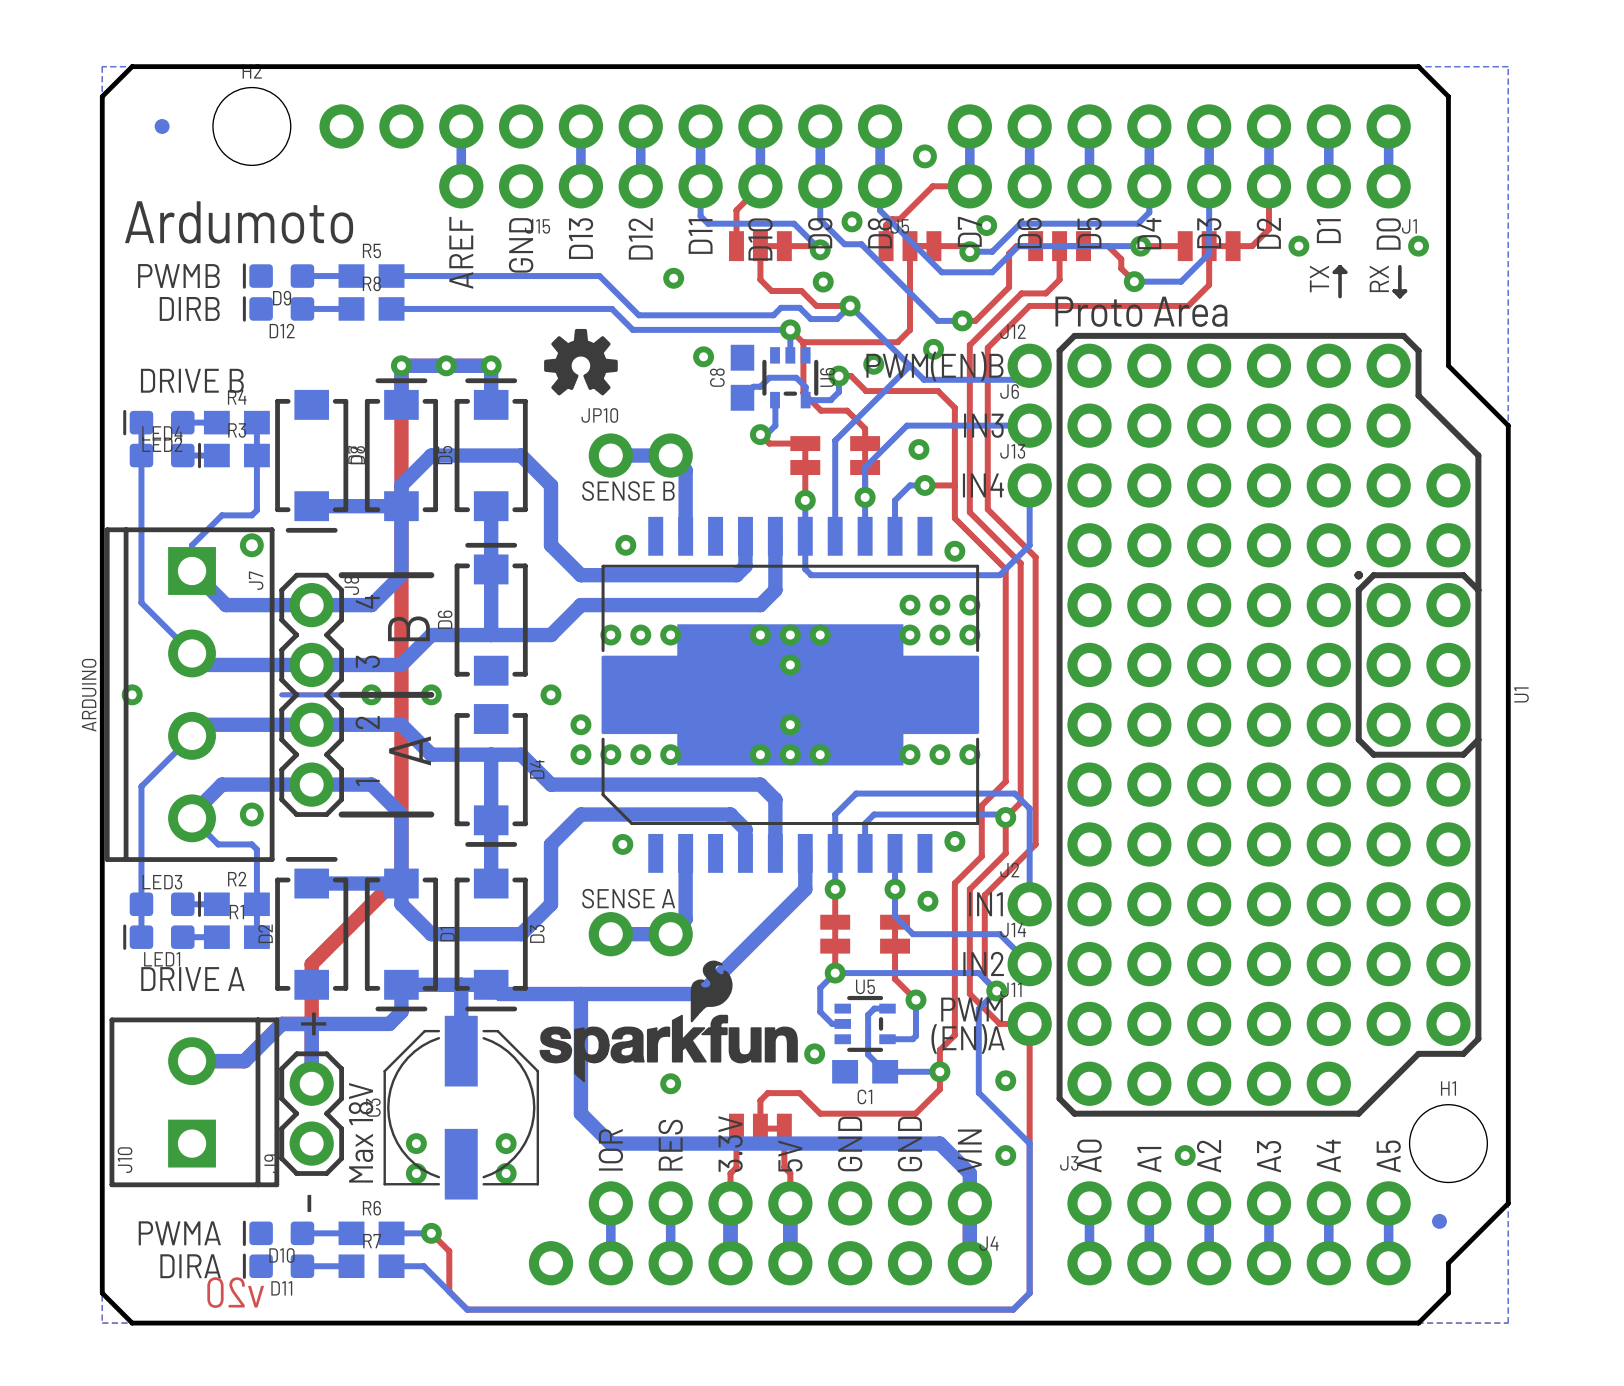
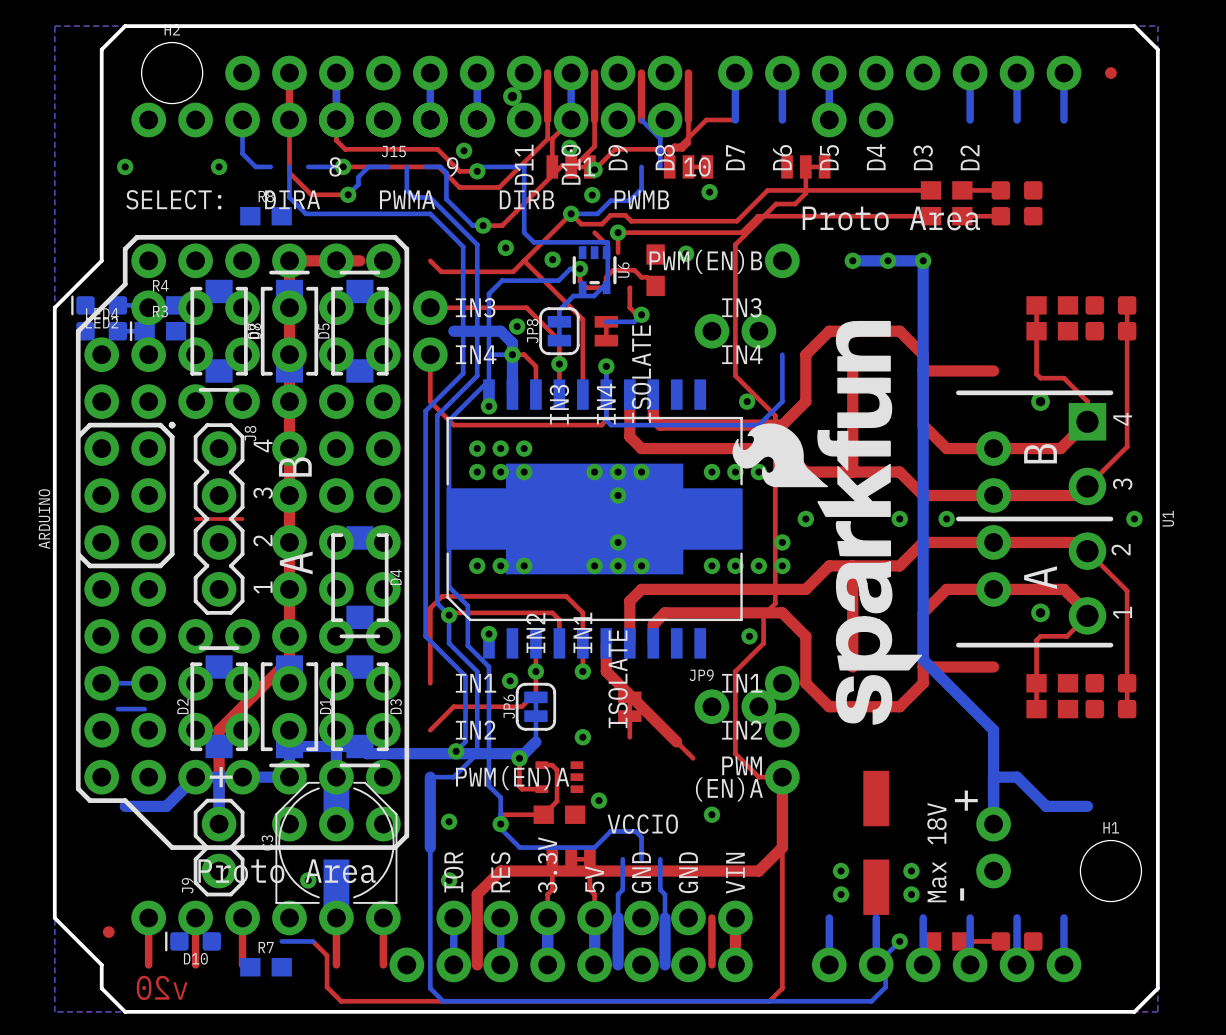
board edge: (192, 66) (132, 66) (102, 96) (102, 425) -> (125, 26) (101, 49) (101, 260) (54, 307)
board edge: (1418, 66) (1448, 96) (1448, 365) (1508, 425) -> (1087, 26) (1134, 26) (1157, 49) (1157, 307)
part: (162, 126) -> none
top track: none -> (289, 73) (289, 172) (311, 194) (348, 194)
top track: none -> (336, 73) (336, 140) (345, 149) (437, 149) (459, 171) (477, 171)
bottom track: (700, 126) (700, 216) (708, 223) (794, 223) (820, 249) -> none
top track: none -> (547, 73) (547, 139) (499, 187) (459, 187) (439, 166) (343, 166)
top track: none -> (594, 73) (594, 146) (575, 165) (562, 165) (502, 225) (483, 225)
bottom track: (820, 126) (820, 219) (844, 244) (861, 244) (938, 320) (962, 320) -> none
top track: none -> (641, 73) (641, 119)
bottom track: (880, 126) (880, 210) (941, 272) (992, 272) (1018, 246) (1140, 246) -> none
top track: none -> (688, 73) (688, 143) (682, 149) (615, 149) (594, 169)
bottom track: (1149, 126) (1149, 212) (1138, 223) (1020, 223) (992, 251) (969, 251) -> none
bottom track: (1209, 126) (1209, 253) (1181, 281) (1134, 281) -> none
part: none -> (1110, 73)
via: none -> (512, 96)
via: (924, 156) -> none
bottom track: none -> (242, 119) (242, 153) (255, 166) (270, 166)
part: none -> (312, 119)
bottom track: none -> (641, 119) (660, 138) (660, 166)
part: none -> (852, 119)
J1: (1179, 186) -> none
top track: (1268, 186) (1268, 229) (1252, 246) (1233, 246) -> none
via: none -> (569, 147)
via: (852, 221) -> none
text: Ardumoto (239, 222) -> none
via: none -> (464, 150)
via: (986, 225) -> none
text: D1 (1328, 231) -> none
text: D0 (1388, 234) -> none
text: D13 (581, 238) -> none
text: D12 (640, 238) -> none
text: GND (521, 245) -> none
via: none -> (125, 166)
via: none -> (219, 166)
bottom track: none -> (289, 166) (289, 197) (305, 213) (430, 213) (463, 246) (463, 373) (425, 411) (425, 636) (465, 676) (465, 741) (456, 751)
text: none -> 8 (335, 166)
bottom track: none -> (343, 166) (308, 166)
via: none -> (343, 166)
bottom track: none -> (388, 166) (368, 166) (358, 177) (358, 184) (348, 194)
bottom track: none -> (425, 166) (440, 166) (446, 172) (446, 199) (472, 225) (483, 225)
text: none -> 9 (452, 166)
top track: (760, 246) (760, 279) (771, 291) (801, 291) (816, 305) (850, 305) -> none
top track: (784, 246) (816, 246) (820, 249) -> none
text: none -> 1 (589, 166)
bottom track: none -> (641, 166) (641, 188) (629, 200) (610, 200) (597, 213) (571, 213)
text: none -> 10 (697, 166)
top track: (1035, 246) (1016, 246) (1009, 253) (1009, 287) (975, 320) (962, 320) -> none
top track: (1083, 246) (1108, 246) (1121, 259) (1121, 268) (1134, 281) -> none
via: (1140, 246) -> none
top track: (1185, 246) (1140, 246) -> none
top track: (1209, 246) (1209, 285) (1188, 305) (1029, 305) (987, 347) (987, 509) (1035, 557) (1035, 844) (984, 895) (984, 979) (996, 991) -> none
part: (1209, 246) -> none
via: (1298, 246) -> none
via: (1418, 246) -> none
via: none -> (594, 169)
via: (820, 249) -> none
bottom track: none -> (477, 171) (481, 166) (524, 166) (524, 232) (533, 242) (607, 242) (607, 282) (594, 296) (573, 296) (559, 310) (559, 321)
via: none -> (477, 171)
top track: (969, 251) (964, 246) (909, 246) (909, 329) (897, 342) (803, 342) (803, 393) (821, 410) (847, 410) (865, 428) (865, 443) -> none
via: (969, 251) -> none
text: AREF (461, 252) -> none
line: (1340, 266) (1340, 296) -> none
line: (1340, 266) (1345, 272) (1334, 272) (1340, 266) -> none
line: (1399, 266) (1399, 296) -> none
text: PWMB (178, 276) -> none
D9: (278, 276) -> none
bottom track: (351, 276) (302, 276) -> none
R5: (371, 276) -> none
bottom track: (391, 276) (599, 276) (638, 315) (773, 315) (780, 307) (799, 307) (810, 319) (837, 319) (850, 305) (924, 379) (1015, 379) (1029, 365) -> none
top track: none -> (930, 190) (767, 190) (736, 221) (631, 221) (625, 215) (610, 215) (601, 224) (581, 224) (571, 213) (513, 271) (441, 271) (430, 260)
part: none -> (946, 190)
top track: none -> (1000, 190) (962, 190)
part: none -> (1017, 190)
via: (673, 278) -> none
via: none -> (709, 192)
text: RX (1379, 278) -> none
text: TX (1319, 279) -> none
via: none -> (348, 194)
via: (1134, 281) -> none
via: none -> (592, 195)
via: (823, 282) -> none
text: none -> PWMA (407, 199)
text: none -> PWMB (641, 199)
text: none -> SELECT: (173, 199)
text: none -> DIRA (292, 199)
line: (1399, 296) (1394, 291) (1405, 291) (1399, 296) -> none
via: none -> (571, 213)
via: (850, 305) -> none
text position: DIRB (189, 308) -> DIRB (527, 199)
D12: (278, 308) -> none
bottom track: (351, 308) (302, 308) -> none
bottom track: (391, 308) (611, 308) (632, 329) (790, 329) (790, 355) -> none
top track: none -> (930, 216) (758, 216) (741, 232) (618, 232) (618, 252)
part: none -> (946, 216)
top track: none -> (1000, 216) (962, 216)
part: none -> (1017, 216)
via: none -> (483, 225)
via: (962, 320) -> none
drawing: [544, 328, 618, 396] -> none
via: (790, 329) -> none
via: none -> (618, 232)
line: none -> (395, 237) (136, 237) (125, 249) (125, 284) (78, 331) (78, 788) (89, 800) (125, 800) (172, 847) (395, 847) (406, 835) (406, 249) (395, 237)
line: (1403, 335) (1074, 335) (1059, 350) (1059, 1098) (1074, 1113) (1358, 1113) (1418, 1053) (1463, 1053) (1478, 1038) (1478, 455) (1418, 395) (1418, 350) (1403, 335) -> none
via size: [1187, 343, 1232, 388] -> [914, 252, 932, 270]
via: none -> (505, 247)
via: (933, 349) -> none
via size: [390, 355, 412, 377] -> [272, 243, 307, 279]
via: (703, 356) -> none
via: none -> (686, 253)
via: none -> (552, 259)
via: (873, 364) -> none
via: none -> (148, 260)
via: none -> (195, 260)
via: none -> (242, 260)
via: (446, 365) -> none
via: none -> (336, 260)
via: (491, 365) -> none
via: none -> (383, 260)
top track: none -> (524, 260) (582, 319) (582, 394)
bottom track: (909, 365) (835, 440) (835, 536) -> none
via: (1089, 365) -> none
bottom track: none -> (852, 260) (923, 260) (923, 659) (993, 730) (993, 824)
via: none -> (852, 260)
via: (1149, 365) -> none
via: none -> (887, 260)
via: (1268, 365) -> none
via: (1328, 365) -> none
via: (1388, 365) -> none
top track: none -> (579, 268) (579, 281) (586, 287) (606, 287) (606, 277) (613, 270) (634, 270) (641, 277) (646, 277) (655, 285)
bottom track: none -> (579, 268) (570, 268) (558, 280) (502, 280) (488, 293) (488, 380) (449, 420) (449, 587) (467, 605) (467, 645) (488, 666) (488, 785) (500, 797) (500, 828) (519, 847) (594, 847) (610, 831) (635, 831) (641, 837) (641, 859)
via: none -> (579, 268)
top track: (838, 376) (851, 376) (866, 391) (938, 391) (954, 407) (954, 518) (1005, 569) (1005, 781) (981, 805) (981, 856) (954, 883) (954, 1035) (939, 1050) (939, 1089) (915, 1113) (820, 1113) (799, 1093) (767, 1093) (760, 1100) (760, 1128) -> none
bottom track: (838, 376) (838, 391) (830, 400) (805, 400) (805, 387) (796, 377) (769, 377) (760, 386) (753, 386) (742, 397) -> none
via: (838, 376) -> none
C8 side: bottom (742, 377) -> top (655, 270)
text: DRIVE B (192, 380) -> none
bottom track: (775, 400) (775, 425) (766, 434) (760, 434) -> none
top track: none -> (630, 287) (629, 307) (636, 314) (641, 314)
bottom track: (491, 404) (491, 365) (401, 365) (401, 404) -> none
bottom track: (141, 422) (141, 602) (203, 664) (401, 664) (431, 635) (551, 635) (580, 605) (760, 605) (775, 590) (775, 536) -> none
bottom track: (256, 422) (256, 510) (251, 515) (221, 515) (192, 545) (192, 571) (226, 605) (371, 605) (401, 575) (401, 485) (431, 455) (521, 455) (551, 485) (551, 545) (580, 575) (736, 575) (745, 566) (745, 536) -> none
top track: none -> (1036, 305) (1036, 374) (1040, 378) (1064, 378) (1087, 401) (1087, 421) (1060, 448) (946, 448) (923, 425) (923, 354) (899, 331) (829, 331) (805, 354) (805, 401) (782, 425) (660, 425) (653, 418) (653, 394)
part: none -> (1052, 305)
part: none -> (1110, 305)
top track: none -> (1127, 305) (1127, 446) (1078, 495) (923, 495) (899, 472) (805, 472) (782, 448) (641, 448) (629, 436) (629, 394)
via: none -> (148, 307)
via: none -> (195, 307)
via: none -> (242, 307)
via: none -> (289, 307)
via: none -> (336, 307)
via: none -> (383, 307)
top track: none -> (430, 307) (526, 307) (559, 340) (559, 394)
text: none -> IN3 (475, 307)
bottom track: (1029, 425) (907, 425) (865, 467) (865, 536) -> none
J6 position: (1029, 425) -> (430, 307)
via: (1089, 425) -> none
via: (1149, 425) -> none
via: (1209, 425) -> none
via: (1268, 425) -> none
via: (1328, 425) -> none
via: (1388, 425) -> none
top track: (760, 434) (769, 443) (805, 443) -> none
via: (760, 434) -> none
bottom track: none -> (641, 314) (634, 321) (606, 321)
via: none -> (641, 314)
drawing: none -> [732, 320, 923, 725]
via: none -> (517, 326)
via: (918, 449) -> none
JP10 position: (640, 455) -> (735, 331)
JP8 side: top (865, 455) -> bottom (559, 331)
part: none -> (1052, 331)
part: none -> (1110, 331)
top track: (805, 467) (805, 500) -> (430, 354) (430, 401) (453, 425) (601, 425) (606, 420) (606, 366)
via: none -> (101, 354)
via: none -> (148, 354)
via: none -> (195, 354)
via: none -> (242, 354)
via: none -> (289, 354)
via: none -> (336, 354)
via: none -> (383, 354)
text: none -> IN4 (476, 354)
top track: none -> (512, 354) (524, 354) (535, 366) (535, 394)
bottom track: none -> (512, 354) (488, 354)
via: none -> (512, 354)
bottom track: (924, 485) (909, 485) (895, 500) (895, 536) -> none
via: (924, 485) -> none
top track: (954, 485) (924, 485) -> none
J13 position: (1029, 485) -> (430, 354)
via: (1089, 485) -> none
via: (1149, 485) -> none
via: (1209, 485) -> none
via: (1268, 485) -> none
via: (1328, 485) -> none
via: (1388, 485) -> none
via: (1448, 485) -> none
text: SENSE B (628, 491) -> none
via: none -> (559, 364)
via: (865, 497) -> none
bottom track: (401, 506) (311, 506) -> none
bottom track: (491, 506) (491, 635) -> none
top track: none -> (852, 370) (852, 472)
top track: none -> (993, 370) (923, 370)
text: none -> ISOLATE (641, 374)
line: none -> (1110, 392) (958, 392)
text: none -> IN3 (559, 404)
text: none -> IN4 (606, 404)
via: none -> (101, 401)
via: none -> (148, 401)
via: (251, 545) -> none
via: none -> (195, 401)
via: none -> (242, 401)
via: none -> (289, 401)
via: none -> (336, 401)
via: none -> (383, 401)
via position: (625, 545) -> (488, 406)
via: (1089, 545) -> none
via: (1149, 545) -> none
via: (1209, 545) -> none
via: (1268, 545) -> none
via: (1328, 545) -> none
via: none -> (1040, 401)
via: (1388, 545) -> none
via: (1448, 545) -> none
via position: (954, 551) -> (747, 401)
text: none -> 4 (1122, 419)
line: none -> (172, 423) (170, 425) (172, 426) (173, 425) (172, 423)
line: (1358, 573) (1356, 575) (1358, 577) (1360, 575) (1358, 573) -> none
line: (431, 575) (341, 575) -> none
line: none -> (78, 436) (89, 425) (160, 425) (172, 436) (172, 554) (160, 565) (89, 565) (78, 554)
line: (1478, 590) (1463, 575) (1373, 575) (1358, 590) (1358, 739) (1373, 754) (1463, 754) (1478, 739) -> none
via: none -> (101, 448)
via: none -> (148, 448)
via: none -> (289, 448)
via: none -> (336, 448)
via: none -> (383, 448)
via: none -> (477, 448)
via: none -> (500, 448)
via: none -> (524, 448)
via: (909, 605) -> none
via: (939, 605) -> none
via: (969, 605) -> none
via: (1089, 605) -> none
via: (1149, 605) -> none
via: (1209, 605) -> none
via: (1268, 605) -> none
via: (1328, 605) -> none
via: (1388, 605) -> none
via: (1448, 605) -> none
text: none -> B (1040, 453)
D6: (491, 614) -> none
via: (610, 635) -> none
via: none -> (524, 472)
via: (760, 635) -> none
via: none -> (641, 472)
via: (909, 635) -> none
via: none -> (758, 472)
text: none -> 3 (1122, 484)
via: none -> (101, 495)
via: none -> (148, 495)
via: none -> (289, 495)
via: none -> (336, 495)
via: none -> (383, 495)
via position: (790, 664) -> (618, 495)
via: (1089, 664) -> none
via: (1149, 664) -> none
via: (1209, 664) -> none
via: (1268, 664) -> none
via: (1328, 664) -> none
via: (1388, 664) -> none
via: (1448, 664) -> none
via: (132, 694) -> none
J7: (189, 694) -> none
bottom track: (341, 694) (281, 694) -> none
via: (371, 694) -> none
line: (431, 694) (341, 694) -> none
via: (431, 694) -> none
via: (551, 694) -> none
via: none -> (805, 518)
via: none -> (899, 518)
via: none -> (946, 518)
part: none -> (993, 518)
part: none -> (1087, 518)
line: none -> (1110, 518) (958, 518)
via: none -> (1134, 518)
via: none -> (101, 542)
via: none -> (148, 542)
via: none -> (289, 542)
via: none -> (336, 542)
via: none -> (383, 542)
via: (580, 724) -> none
via position: (790, 724) -> (618, 542)
via: none -> (782, 542)
via: (1089, 724) -> none
via: (1149, 724) -> none
via: (1209, 724) -> none
via: (1268, 724) -> none
via: (1328, 724) -> none
via: (1388, 724) -> none
via: (1448, 724) -> none
text: none -> 2 (1121, 549)
bottom track: (491, 754) (491, 883) -> none
via: (580, 754) -> none
via: (610, 754) -> none
via: none -> (524, 565)
via: (760, 754) -> none
via: none -> (641, 565)
via: (909, 754) -> none
via: none -> (758, 565)
via: none -> (782, 565)
top track: none -> (852, 565) (852, 667)
text: none -> A (1040, 577)
via: none -> (101, 589)
via: none -> (148, 589)
via: none -> (289, 589)
via: none -> (336, 589)
via: none -> (383, 589)
via: (1089, 784) -> none
via: (1149, 784) -> none
via: (1209, 784) -> none
via: (1268, 784) -> none
via: (1328, 784) -> none
via: (1388, 784) -> none
via: (1448, 784) -> none
via: (251, 814) -> none
line: (431, 814) (341, 814) -> none
via: none -> (1040, 612)
text: none -> 1 (1122, 612)
top track: none -> (449, 615) (451, 612) (552, 612) (559, 619) (559, 643)
via: none -> (449, 615)
bottom track: (1005, 817) (1002, 814) (874, 814) (865, 823) (865, 853) -> none
via: (1005, 817) -> none
via: none -> (488, 633)
via: (954, 841) -> none
via: none -> (101, 636)
via: none -> (148, 636)
via: none -> (195, 636)
via: none -> (242, 636)
via: none -> (289, 636)
via: none -> (336, 636)
via: none -> (383, 636)
via: (622, 844) -> none
via: none -> (749, 636)
via: (1089, 844) -> none
via: (1149, 844) -> none
via: (1209, 844) -> none
via: (1268, 844) -> none
via: (1328, 844) -> none
via: (1388, 844) -> none
via: (1448, 844) -> none
text: none -> IN2 (535, 633)
text: none -> IN1 (582, 632)
bottom track: (685, 853) (685, 919) (670, 934) (610, 934) -> none
top track: none -> (535, 643) (535, 692) (521, 706) (453, 706) (430, 730)
bottom track: (745, 853) (745, 829) (730, 814) (580, 814) (551, 844) (551, 904) (521, 934) (431, 934) (401, 904) (401, 814) (371, 784) (221, 784) (192, 814) (192, 818) (218, 844) (251, 844) (256, 849) (256, 937) -> none
bottom track: (775, 853) (775, 799) (760, 784) (551, 784) (521, 754) (431, 754) (401, 724) (203, 724) (141, 786) (141, 937) -> none
bottom track: (805, 853) (805, 889) (715, 979) -> (535, 716) (535, 741)
top track: none -> (629, 643) (629, 601) (641, 589) (805, 589) (829, 565) (899, 565) (923, 542) (1078, 542) (1127, 590) (1127, 709)
top track: none -> (653, 643) (653, 624) (665, 612) (782, 612) (805, 636) (805, 683) (829, 706) (899, 706) (923, 683) (923, 612) (946, 589) (1064, 589) (1087, 612) (1087, 615) (1067, 636) (1040, 636) (1036, 640) (1036, 709)
bottom track: (895, 853) (895, 916) (912, 934) (999, 934) (1029, 964) -> none
line: none -> (1110, 645) (958, 645)
bottom track: (401, 883) (311, 883) -> none
top track: none -> (993, 667) (923, 667)
via: none -> (535, 671)
top track: none -> (582, 671) (582, 612) (566, 596) (442, 596) (430, 608) (430, 683)
via: none -> (582, 671)
top track: (835, 889) (835, 922) -> none
bottom track: (835, 889) (835, 814) (856, 793) (1014, 793) (1029, 808) (1029, 904) -> none
via: (835, 889) -> none
via: (895, 889) -> none
text: SENSE A (628, 898) -> none
via: none -> (510, 680)
via: (927, 901) -> none
via: none -> (101, 683)
LED3: (165, 904) -> none
via: none -> (148, 683)
R2: (236, 904) -> none
via: none -> (195, 683)
via: none -> (242, 683)
via: none -> (289, 683)
via: none -> (336, 683)
via: none -> (383, 683)
text: none -> IN1 (476, 683)
text: none -> ISOLATE (618, 679)
via: (1089, 904) -> none
via: (1149, 904) -> none
via: (1209, 904) -> none
via: (1268, 904) -> none
via: (1328, 904) -> none
part: none -> (1052, 683)
via: (1388, 904) -> none
part: none -> (1110, 683)
via: (1448, 904) -> none
JP9 position: (640, 934) -> (735, 706)
JP6 side: top (895, 934) -> bottom (535, 706)
LED1: (158, 937) -> none
R1: (236, 937) -> none
part: none -> (1052, 709)
part: none -> (1110, 709)
top track: (895, 946) (895, 979) -> (606, 643) (606, 671) (676, 741)
drawing: [539, 960, 798, 1083] -> none
text: none -> IN2 (475, 730)
via: none -> (101, 730)
via: none -> (148, 730)
via: none -> (195, 730)
via: none -> (242, 730)
via: none -> (289, 730)
via: none -> (336, 730)
via: none -> (383, 730)
via: (1089, 964) -> none
via: (1149, 964) -> none
via: (1209, 964) -> none
via: (1268, 964) -> none
via: (1328, 964) -> none
via: (1388, 964) -> none
via: (1448, 964) -> none
via: none -> (582, 737)
via: (835, 973) -> none
text: DRIVE A (192, 979) -> none
via: none -> (456, 751)
via: (996, 991) -> none
bottom track: (580, 994) (580, 1023) -> (406, 166) (406, 190) (413, 197) (430, 197) (477, 244) (477, 375) (437, 415) (437, 603) (449, 615) (449, 643) (477, 671) (477, 753) (453, 777) (430, 777)
top track: none -> (519, 758) (519, 786) (522, 789) (541, 789)
via: none -> (519, 758)
bottom track: (915, 999) (915, 1035) (912, 1039) (887, 1039) -> none
via: (915, 999) -> none
top track: none -> (541, 765) (552, 765) (557, 770) (557, 801) (543, 814) (500, 814)
bottom track: (887, 1008) (874, 1008) (868, 1014) (868, 1054) (885, 1071) (939, 1071) -> none
via: none -> (101, 777)
via: none -> (148, 777)
via: none -> (195, 777)
via: none -> (242, 777)
via: none -> (289, 777)
via: none -> (336, 777)
via: none -> (383, 777)
bottom track: (842, 1023) (832, 1023) (820, 1011) (820, 988) (835, 973) (978, 973) (996, 991) (978, 1008) (978, 1092) (1029, 1143) (1029, 1293) (1013, 1309) -> (899, 941) (885, 955) (885, 987) (871, 1001) (769, 1001)
U5 side: bottom (865, 1023) -> top (559, 777)
top track width: thin (1029, 1023) (1029, 1113) -> thick (782, 777) (782, 847)
via: (1089, 1023) -> none
via: (1149, 1023) -> none
via: (1209, 1023) -> none
via: (1268, 1023) -> none
bottom track: none -> (993, 777) (1017, 777) (1046, 806) (1087, 806)
via: (1328, 1023) -> none
via: (1388, 1023) -> none
via: (1448, 1023) -> none
text: none -> PWM(EN)A (512, 778)
via position: (814, 1053) -> (599, 800)
text: none -> + (966, 800)
C1 side: bottom (865, 1071) -> top (559, 814)
via: none -> (449, 821)
via: (1005, 1080) -> none
via: none -> (289, 824)
via: none -> (336, 824)
via: none -> (383, 824)
text: none -> VCCIO (642, 824)
via: (1089, 1083) -> none
via: (1149, 1083) -> none
via: (1209, 1083) -> none
via: (1268, 1083) -> none
via: (1328, 1083) -> none
J10: (194, 1102) -> none
part: none -> (876, 842)
bottom track: (580, 1113) (610, 1143) (939, 1143) (969, 1173) (969, 1263) -> none
top track: none -> (782, 847) (758, 871) (500, 871) (477, 894) (477, 964)
part: none -> (993, 847)
bottom track: none -> (622, 859) (622, 889) (618, 894) (618, 964)
bottom track: none -> (660, 859) (660, 889) (665, 894) (665, 964)
text: Max 18V (361, 1132) -> none
text: none -> Max 18V (936, 852)
text: none -> Proto Area (287, 871)
via: (416, 1143) -> none
via: (506, 1143) -> none
via: none -> (841, 871)
via: none -> (911, 871)
via: none -> (308, 880)
via: none -> (449, 880)
via: (1005, 1155) -> none
via: (1185, 1155) -> none
text: A0 (1089, 1156) -> none
text: A2 (1209, 1156) -> none
text: A3 (1269, 1156) -> - (962, 894)
text: A4 (1328, 1156) -> none
text: A5 (1388, 1156) -> none
text: A1 (1149, 1159) -> none
via: (416, 1173) -> none
via: (506, 1173) -> none
via: none -> (841, 894)
via: none -> (911, 894)
board edge: (102, 1203) (102, 1293) (132, 1323) (192, 1323) -> (54, 917) (101, 964) (101, 988) (125, 1011)
top track: none -> (148, 917) (148, 964)
top track: none -> (195, 917) (195, 964)
text: - (309, 1203) -> none
top track: none -> (242, 917) (242, 964)
part: none -> (266, 917)
top track: none -> (336, 917) (336, 964)
top track: none -> (383, 917) (383, 964)
top track: none -> (711, 917) (711, 964)
J3: (1239, 1203) -> none
board edge: (1508, 1203) (1448, 1263) (1448, 1293) (1418, 1323) -> (1157, 917) (1157, 988) (1134, 1011) (1087, 1011)
part: none -> (108, 932)
part: (1439, 1221) -> none
text: PWMA (179, 1233) -> none
bottom track: (351, 1233) (302, 1233) -> none
R6: (371, 1233) -> none
via: (431, 1233) -> none
via: none -> (899, 941)
part: none -> (946, 941)
top track: none -> (1000, 941) (962, 941)
part: none -> (1017, 941)
text: DIRA (190, 1266) -> none
D11: (278, 1266) -> none
bottom track: (351, 1266) (302, 1266) -> none
bottom track: (391, 1266) (423, 1266) (467, 1309) (597, 1309) -> (430, 847) (430, 988) (443, 1001)

